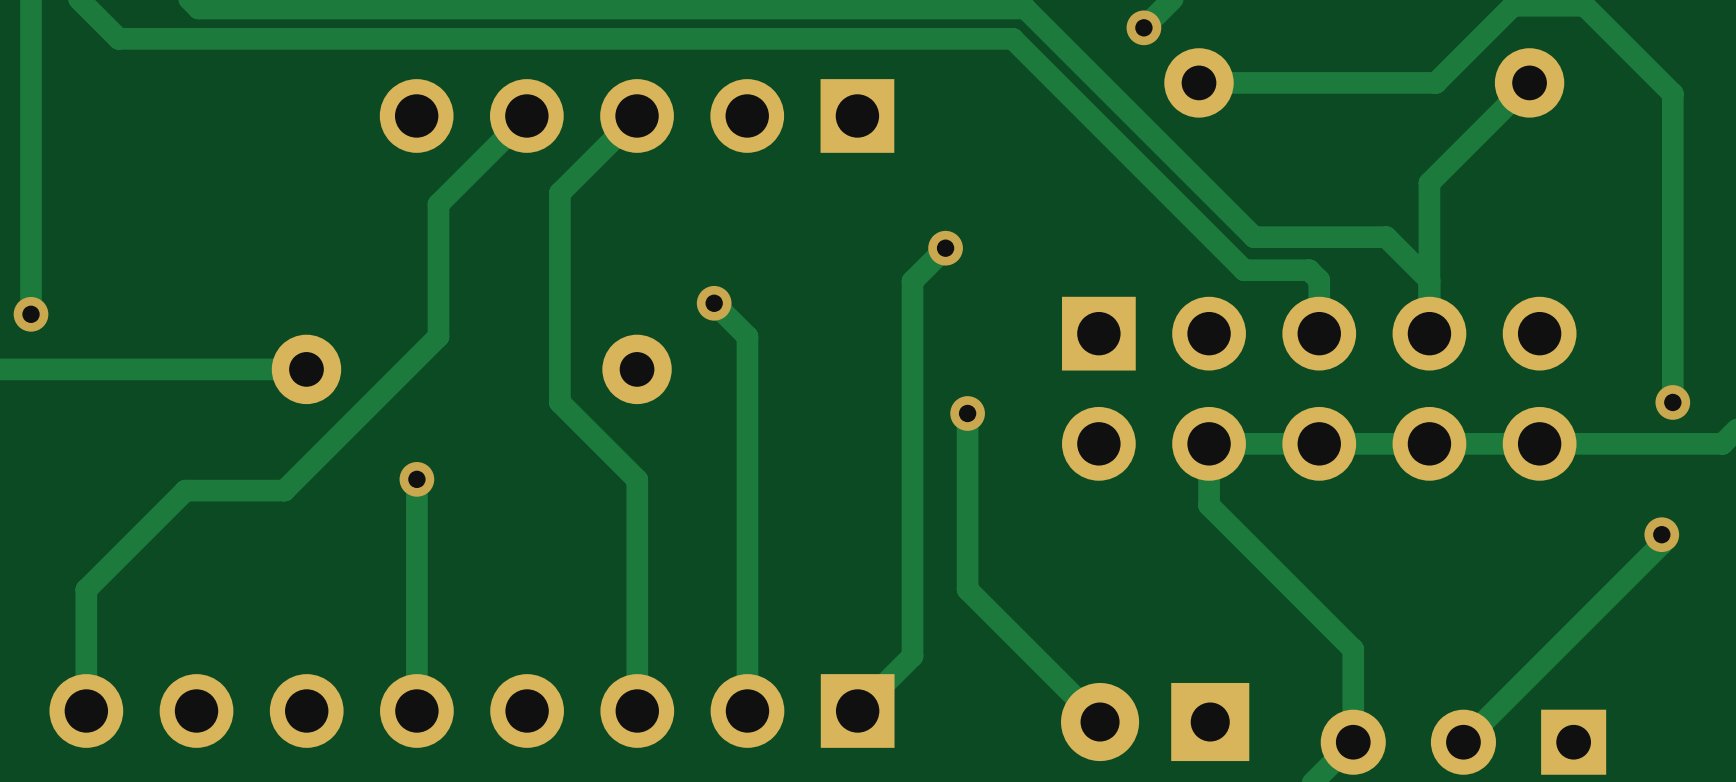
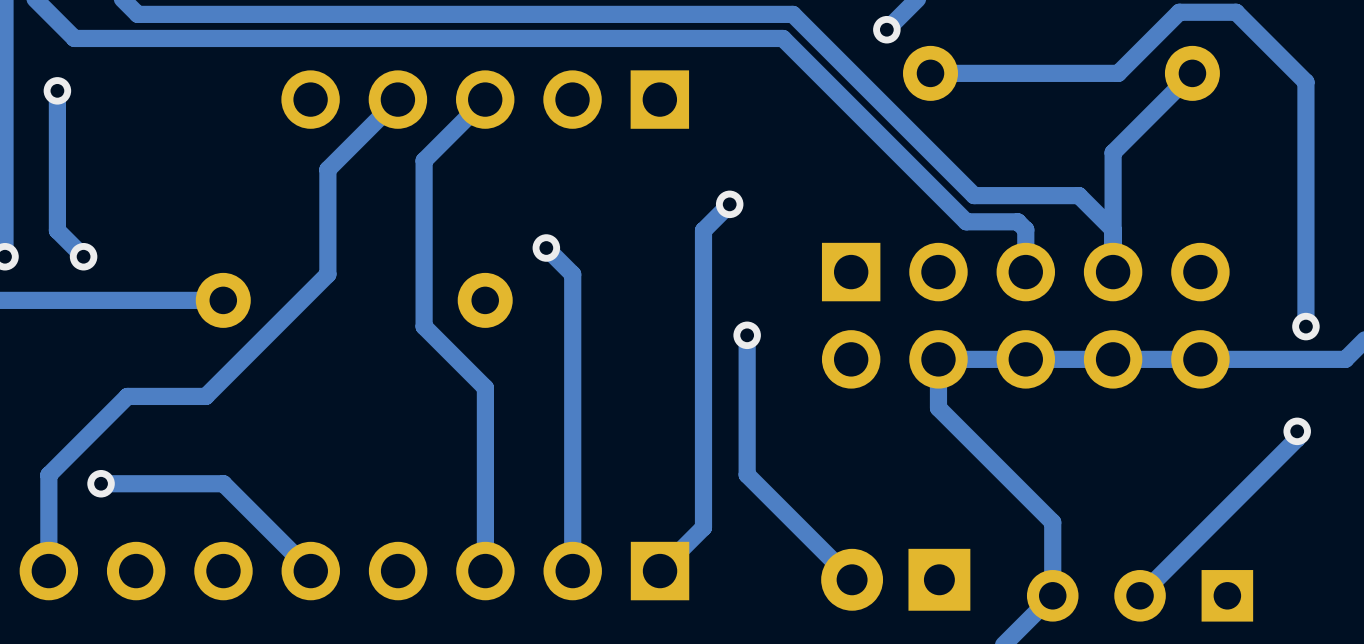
track: none -> (57, 90) (57, 230) (83, 256)
via: none -> (57, 90)
via: none -> (83, 256)
track: (416, 479) (416, 710) -> (101, 483) (223, 483) (310, 571)
via: (416, 479) -> none
via: none -> (101, 483)

